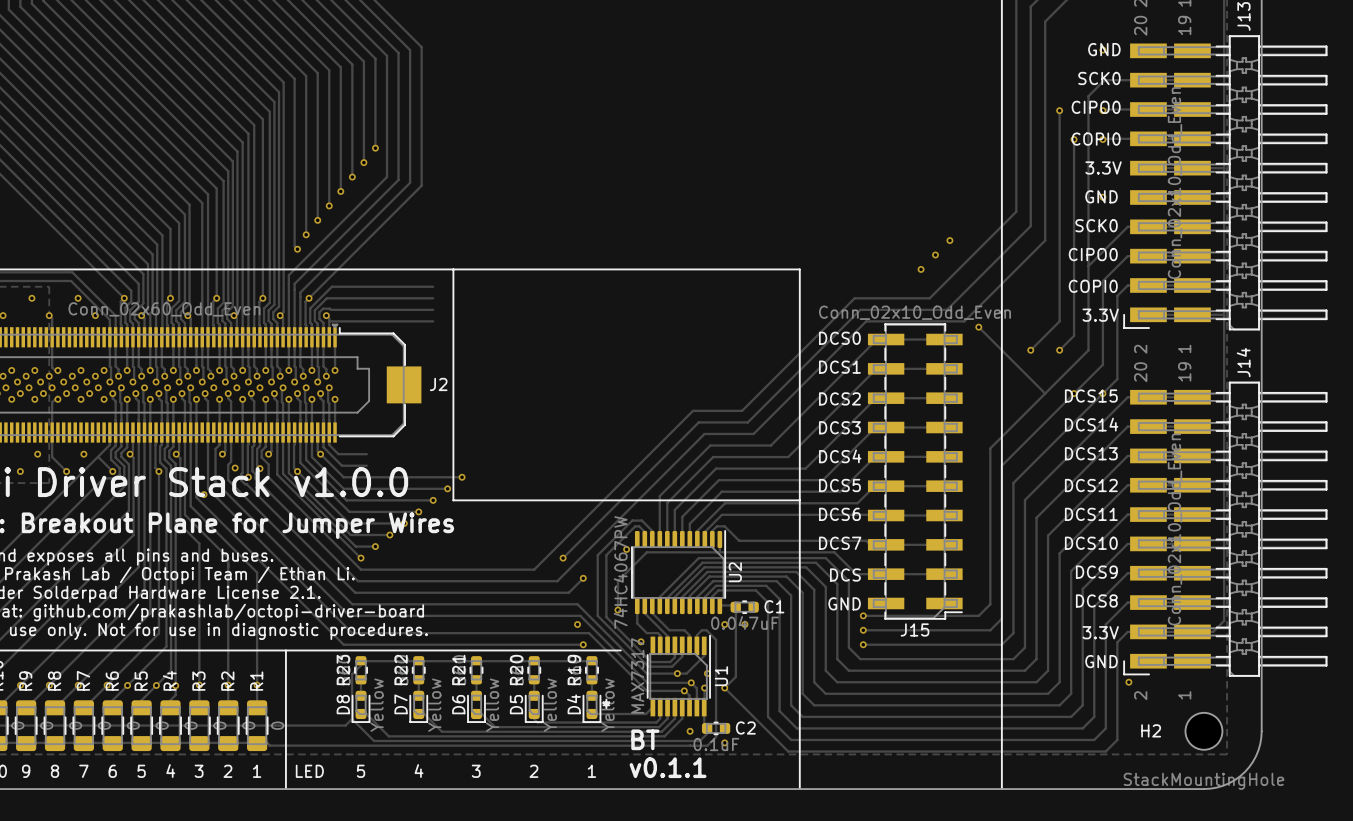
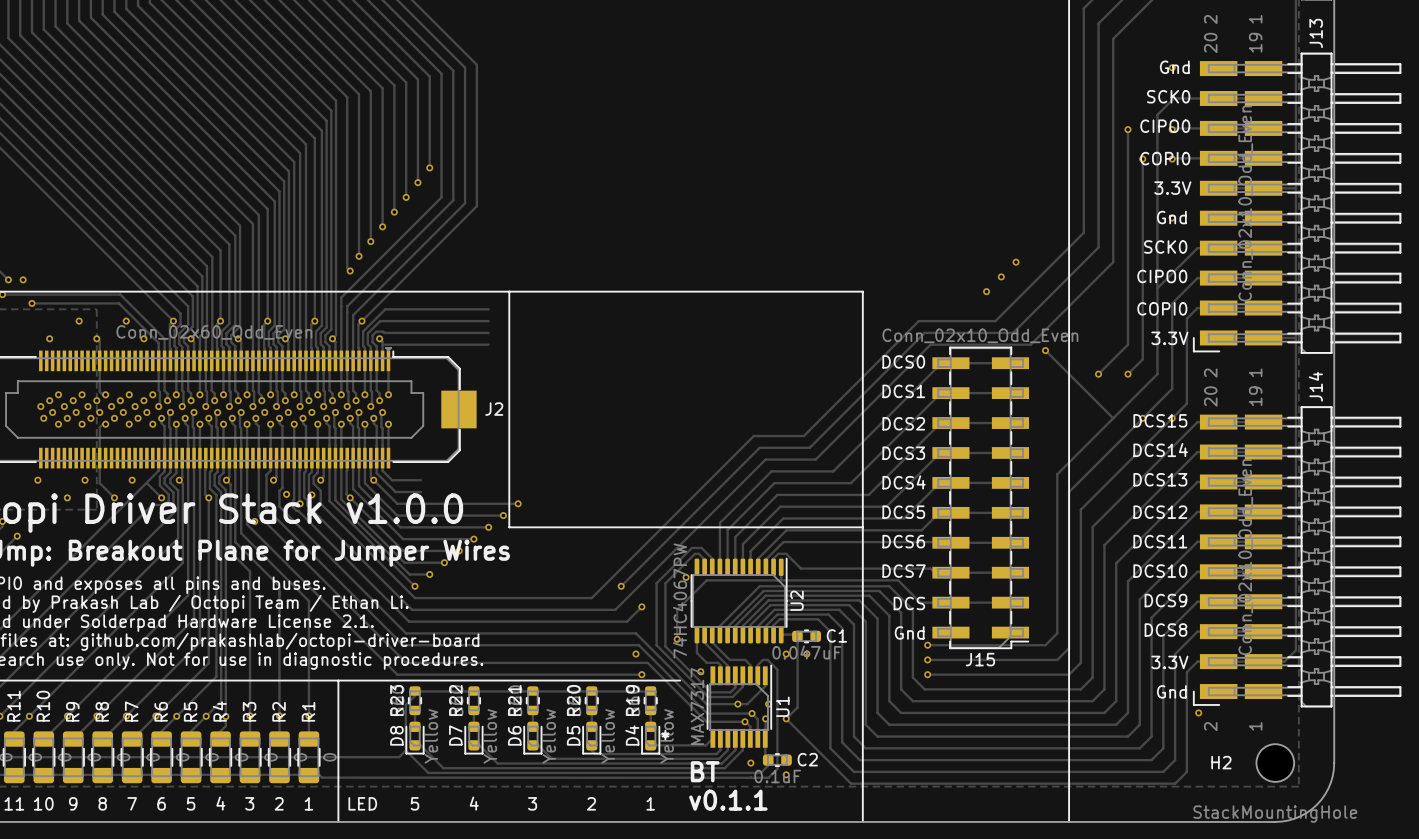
text: GND (1104, 49) -> Gnd (1174, 67)
text: GND (1101, 196) -> Gnd (1171, 217)
text: GND (844, 603) -> Gnd (909, 632)
text: GND (1101, 661) -> Gnd (1171, 691)

